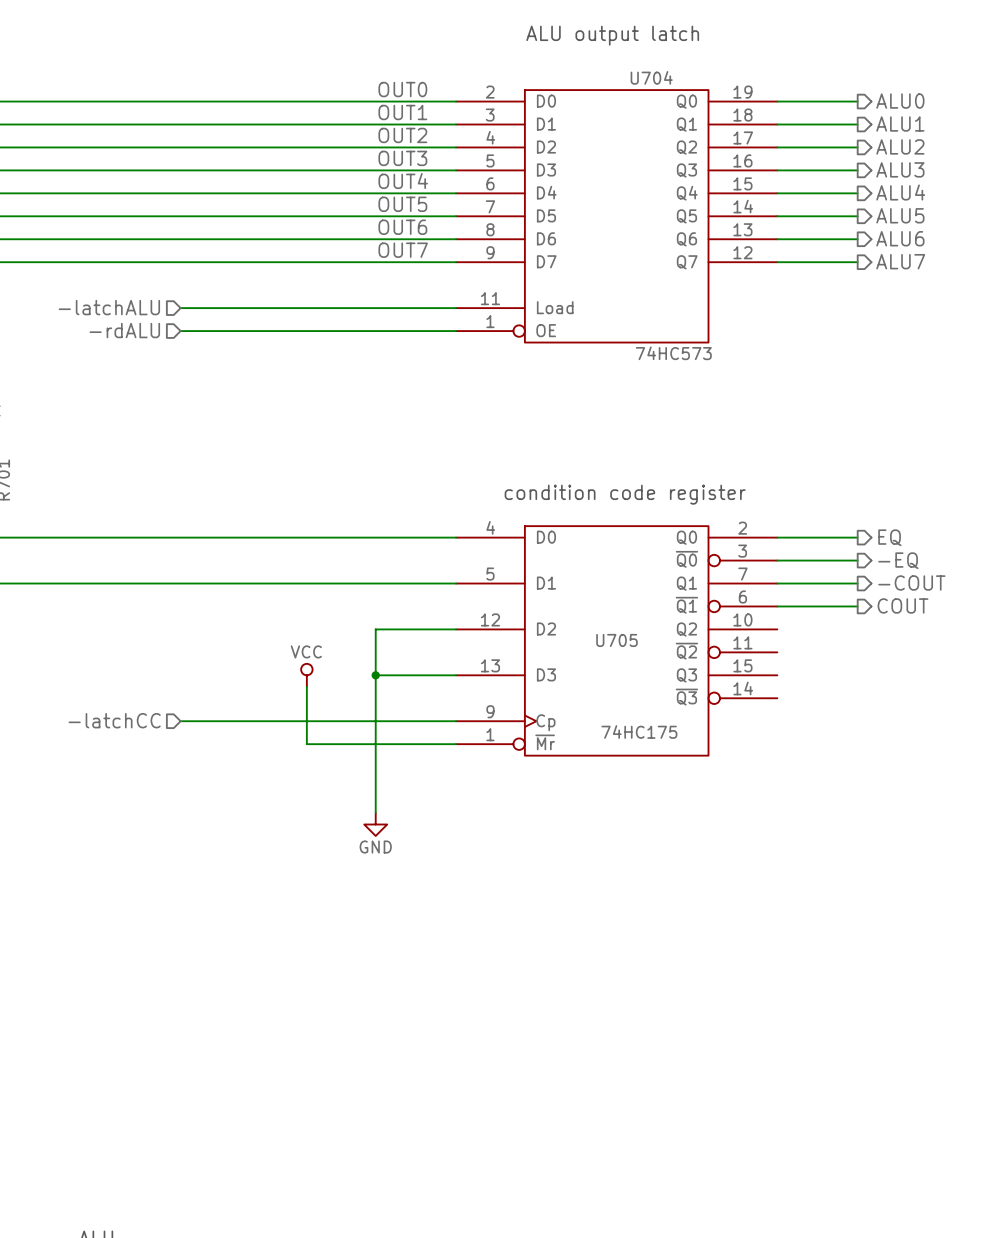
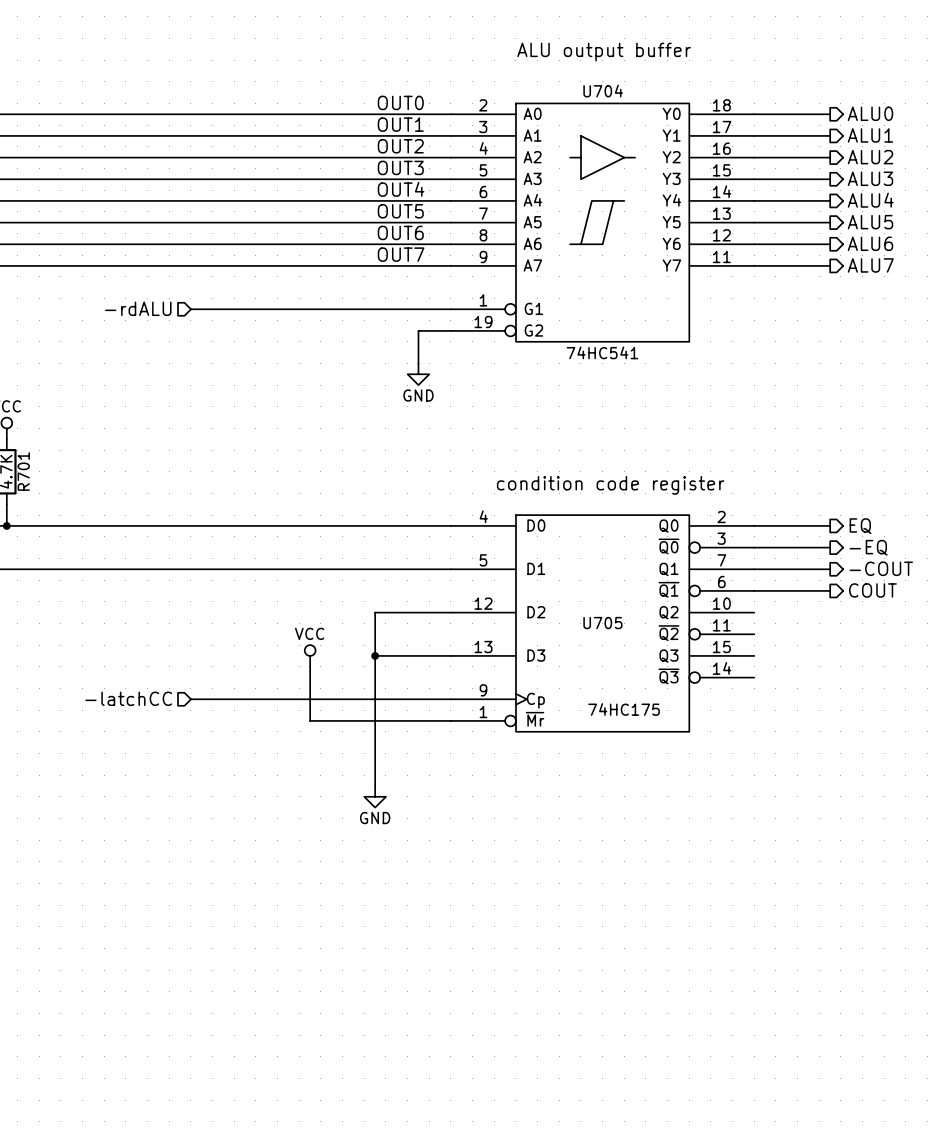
text: ALU output latch (612, 35) -> ALU output buffer (604, 52)
U704 name position: U704 (651, 77) -> U704 (603, 91)
U704 symbol: [456, 90, 778, 343] -> [450, 103, 755, 342]
hierarchical label: -latchALU (109, 307) -> -rdALU (138, 308)
hierarchical label: -rdALU (124, 330) -> none
wire: (180, 331) (421, 331) -> (418, 363) (418, 330)
U704 value: 74HC573 (673, 353) -> 74HC541 (602, 352)
power symbol: none -> GND (418, 374)

